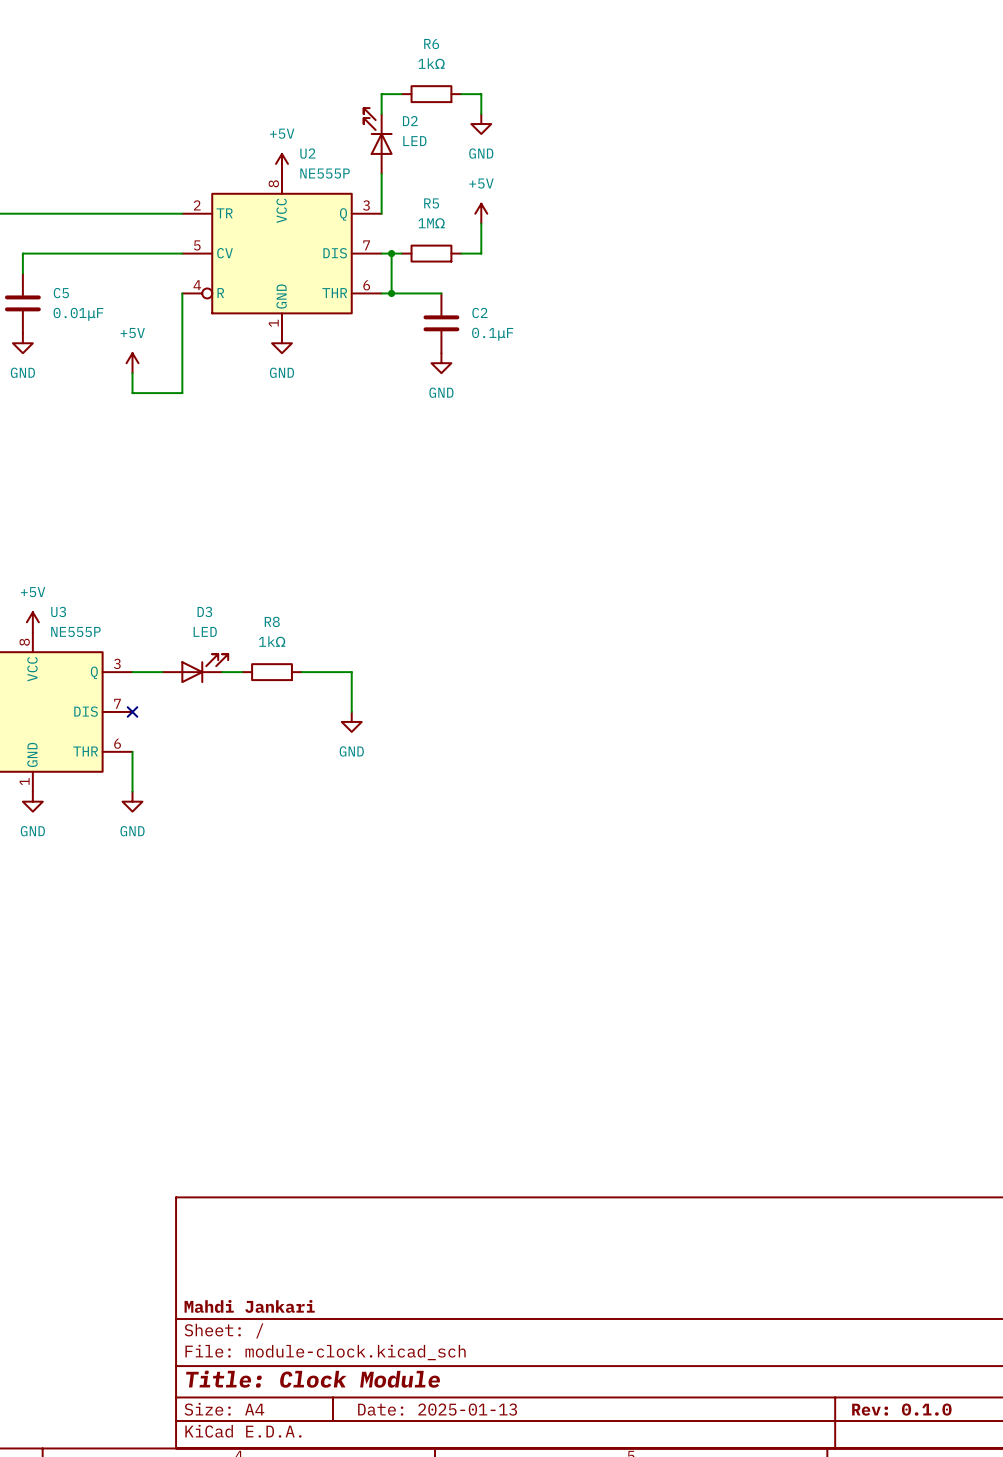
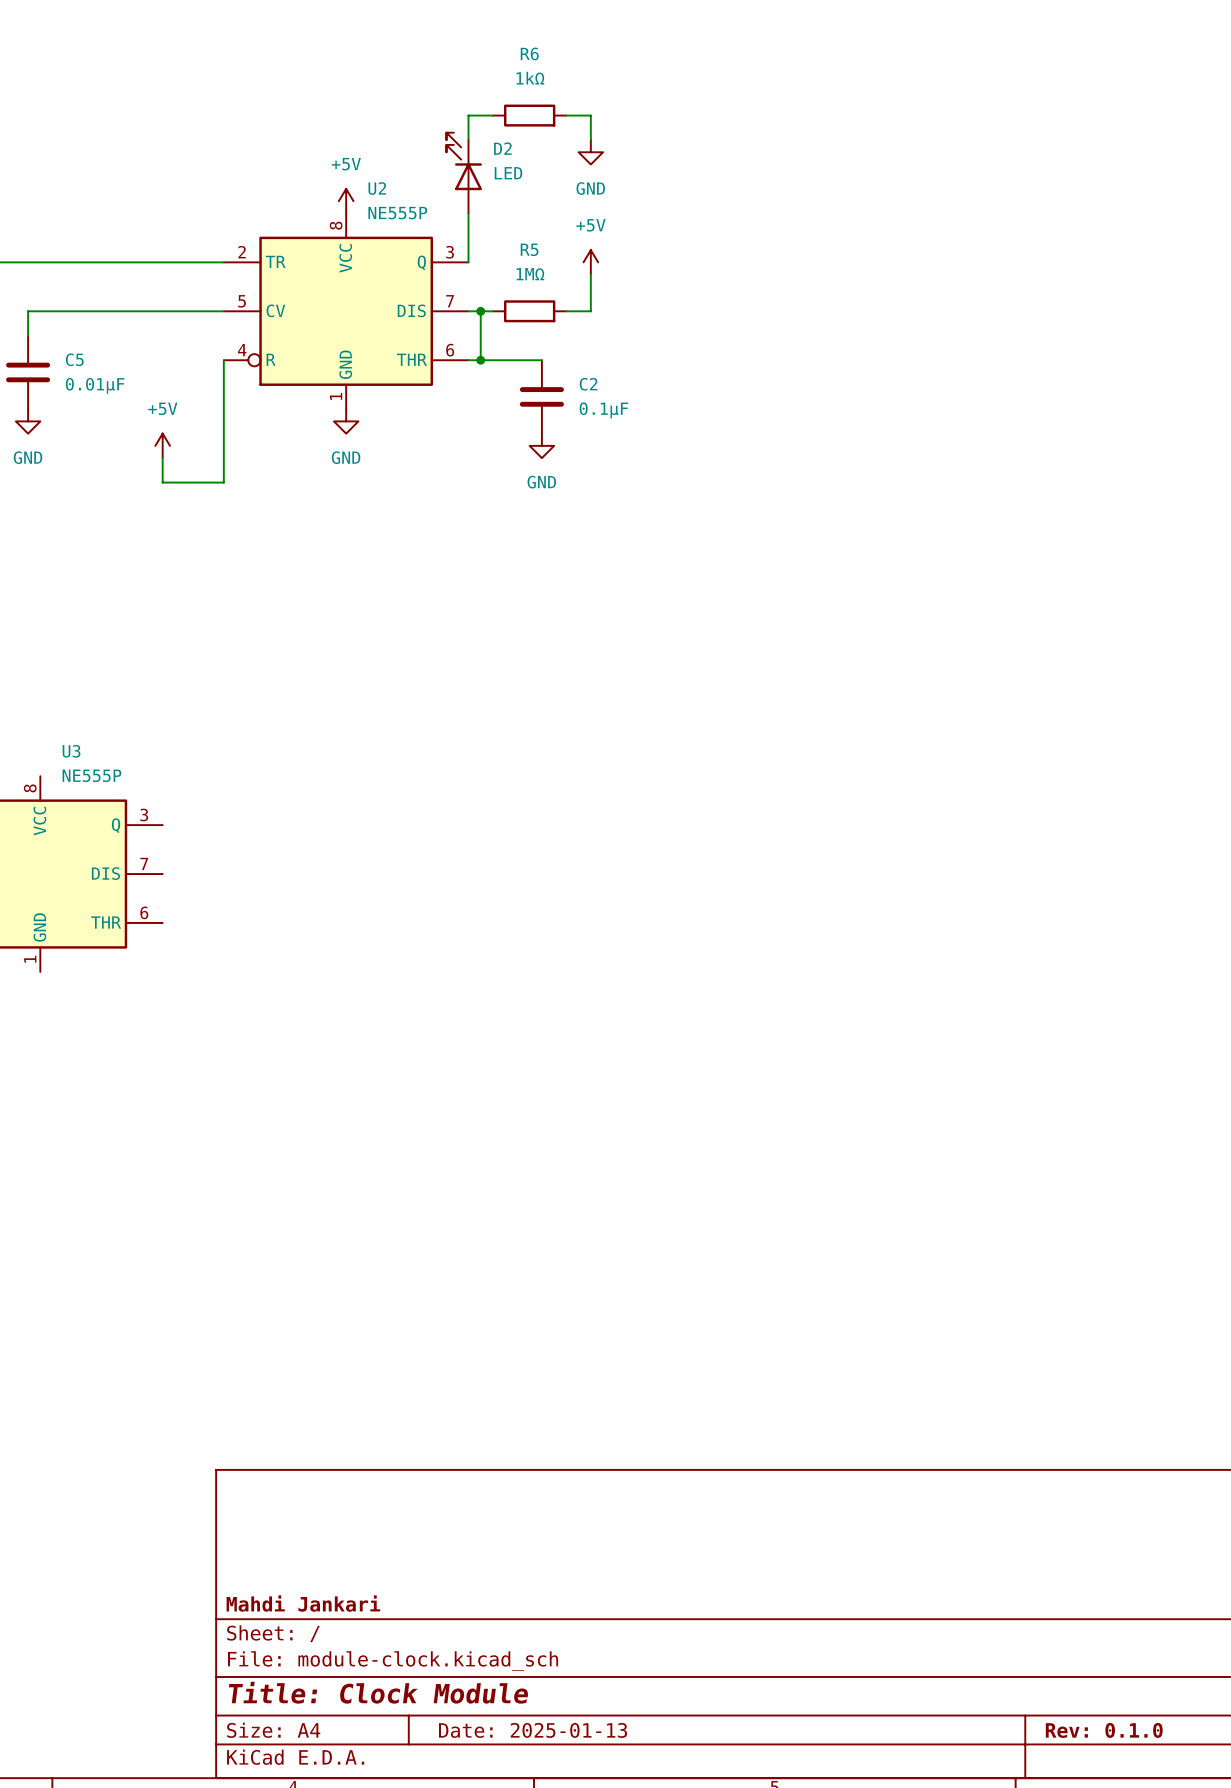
power symbol: +5V (32, 622) -> none
D3: LED (195, 668) -> none
wire: (132, 672) (162, 672) -> none
wire: (222, 672) (242, 672) -> none
R8: 1kΩ (272, 672) -> none
wire: (301, 672) (351, 672) (351, 711) -> none
no-connect mark: (132, 711) -> none
power symbol: GND (351, 721) -> none
wire: (132, 751) (132, 791) -> none
power symbol: GND (32, 801) -> none
power symbol: GND (132, 801) -> none

